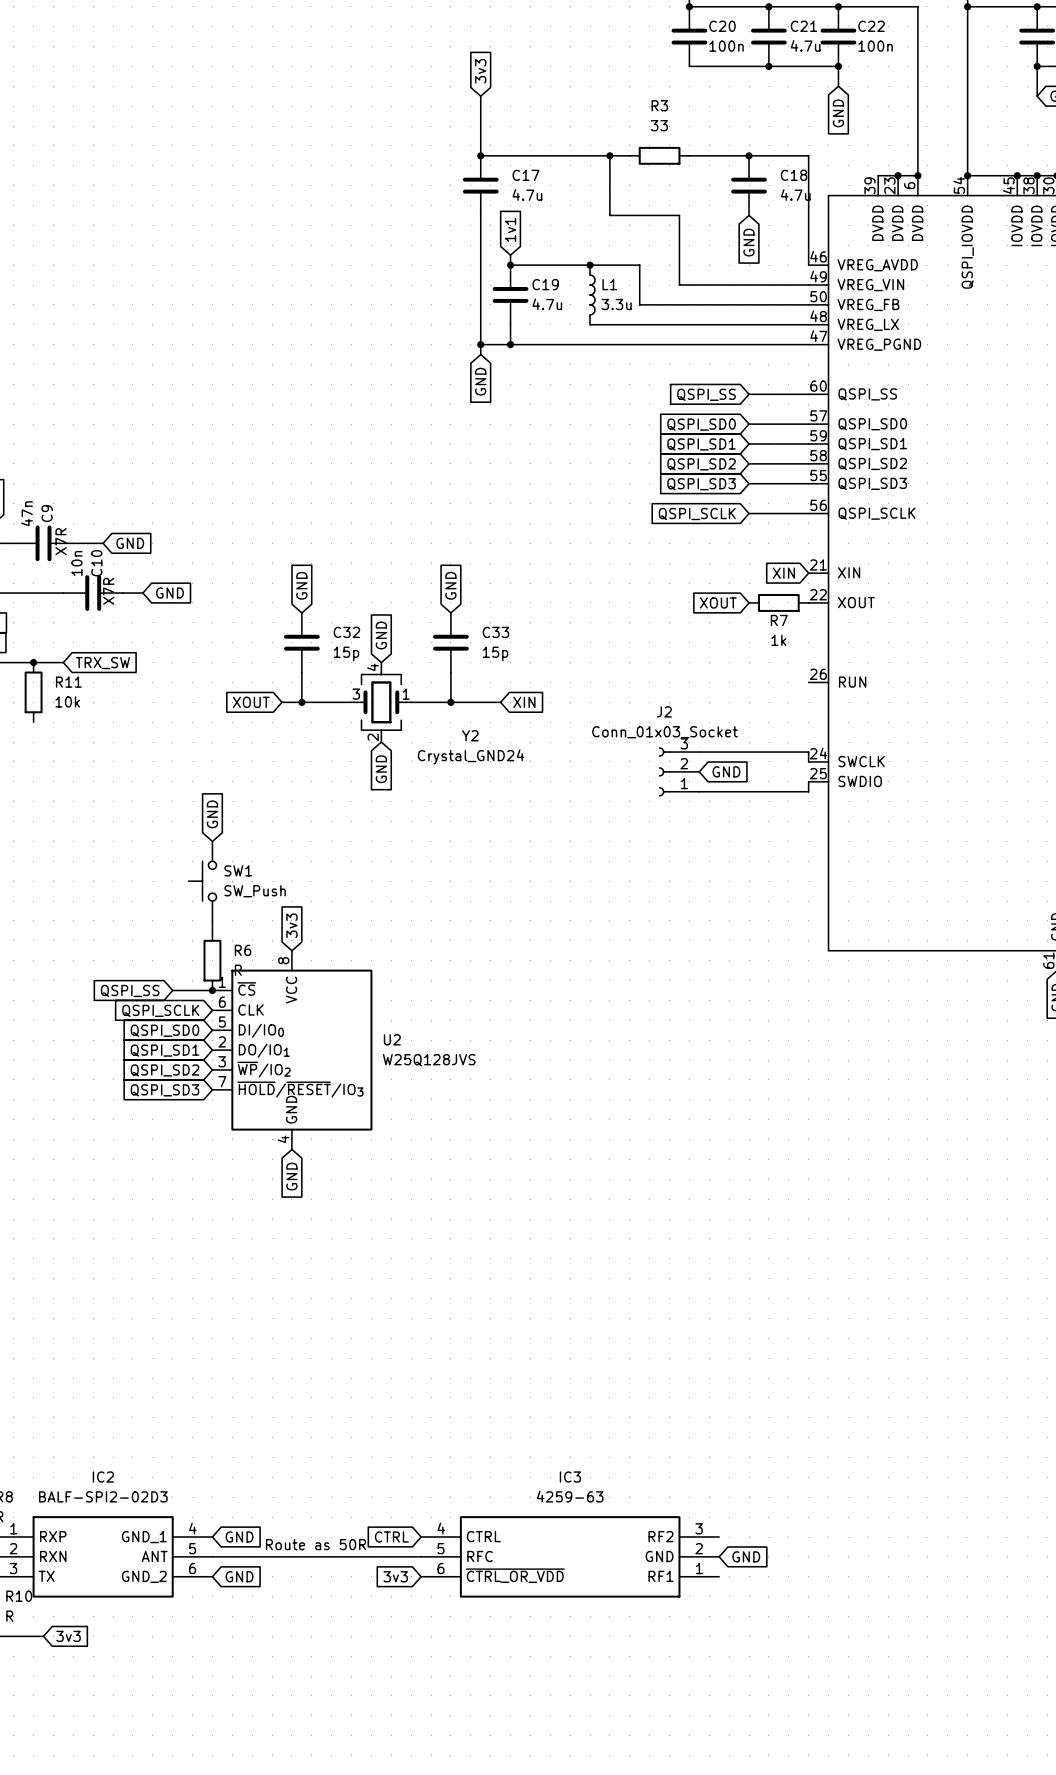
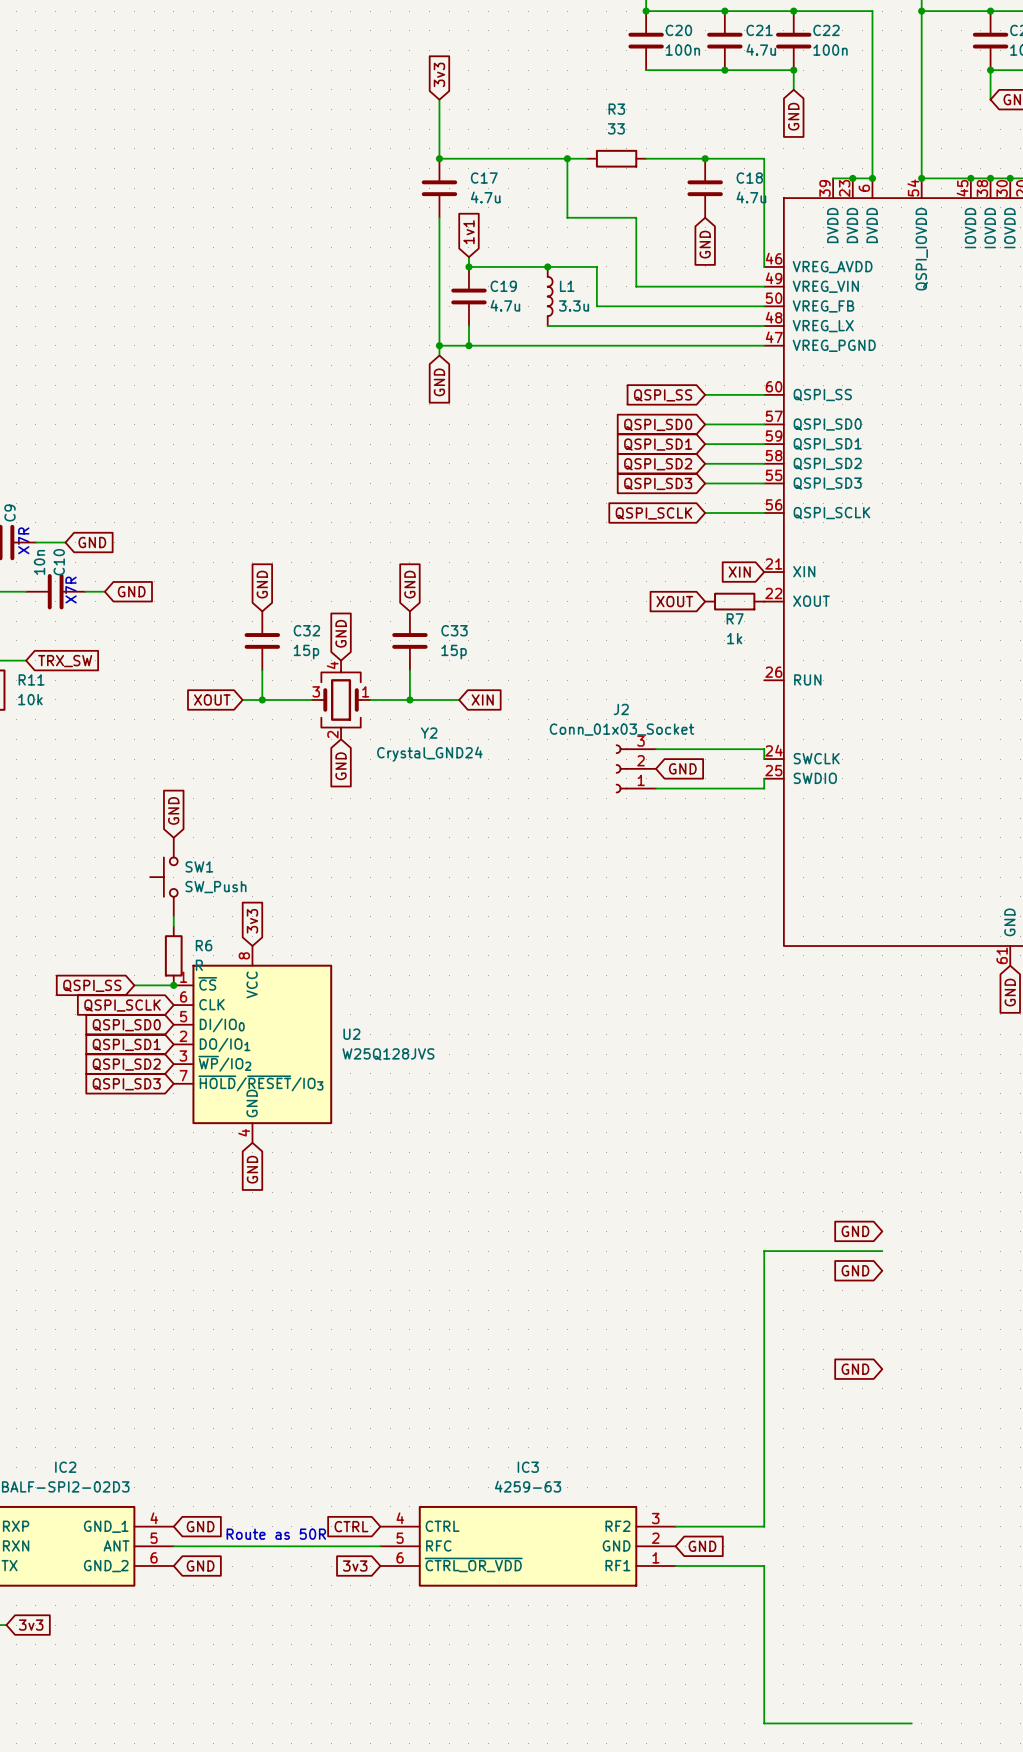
global label: none -> GND (855, 1231)
wire: none -> (882, 1251) (764, 1251) (764, 1526) (675, 1526)
global label: none -> GND (855, 1270)
global label: none -> GND (855, 1369)
wire: none -> (675, 1566) (764, 1566) (764, 1723) (911, 1723)

